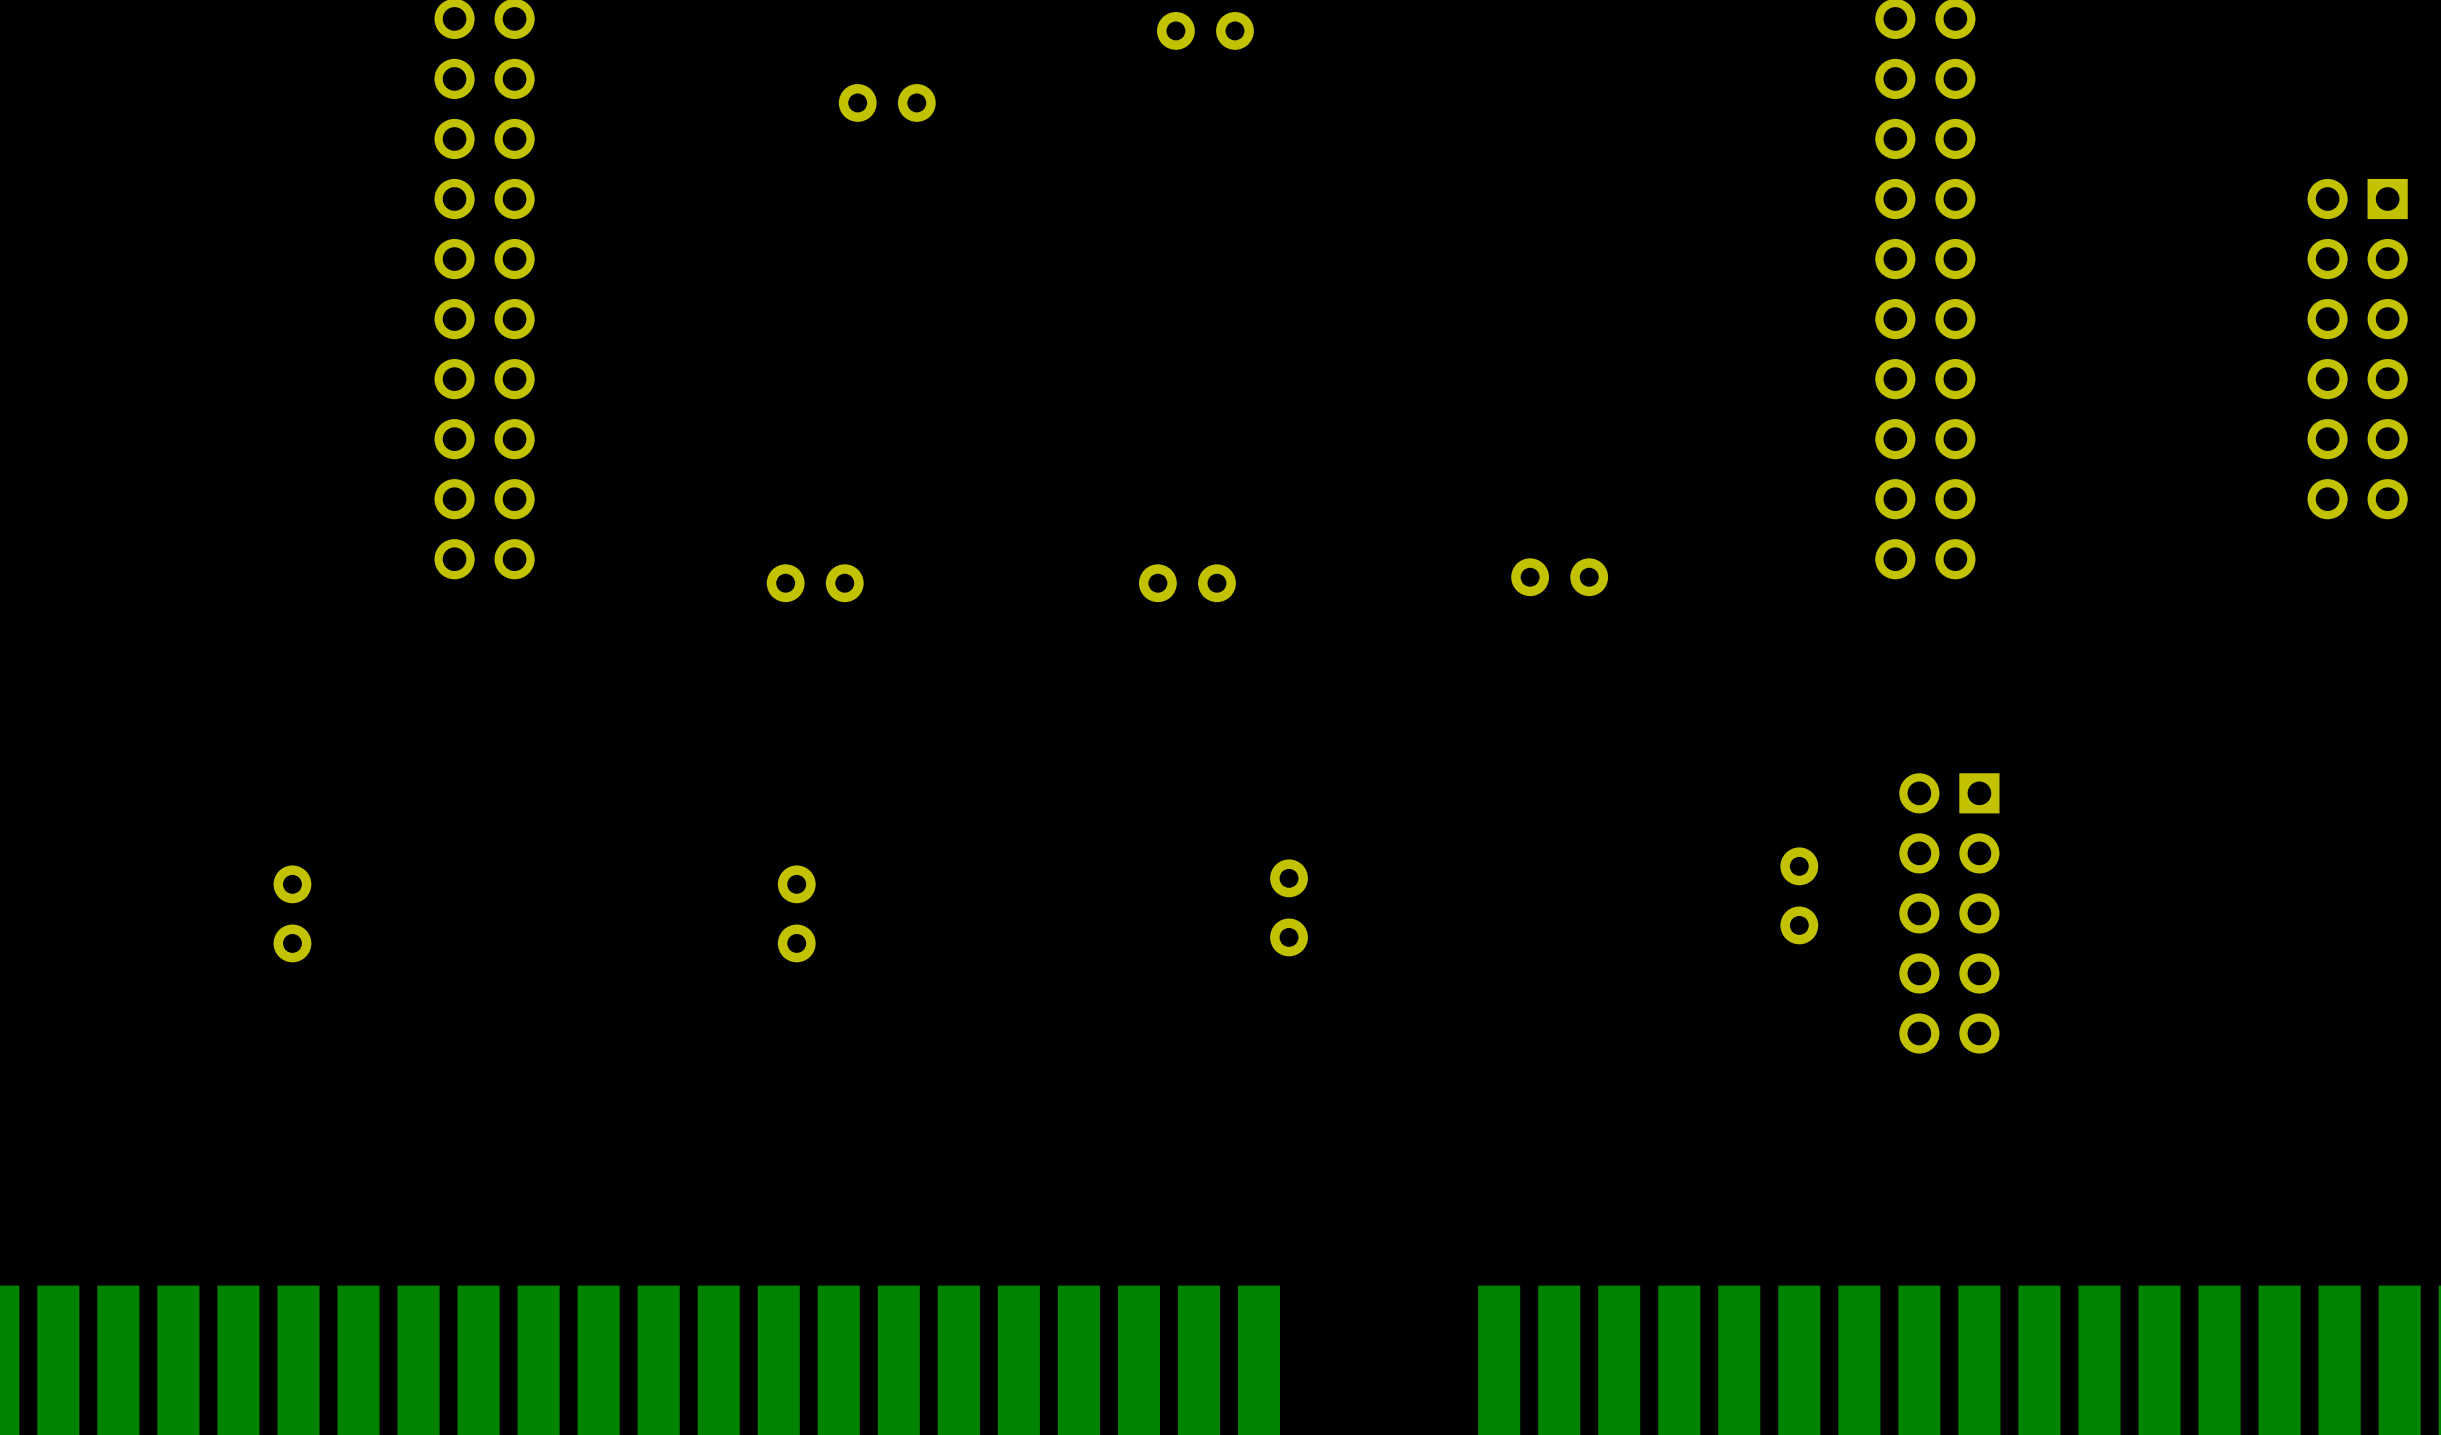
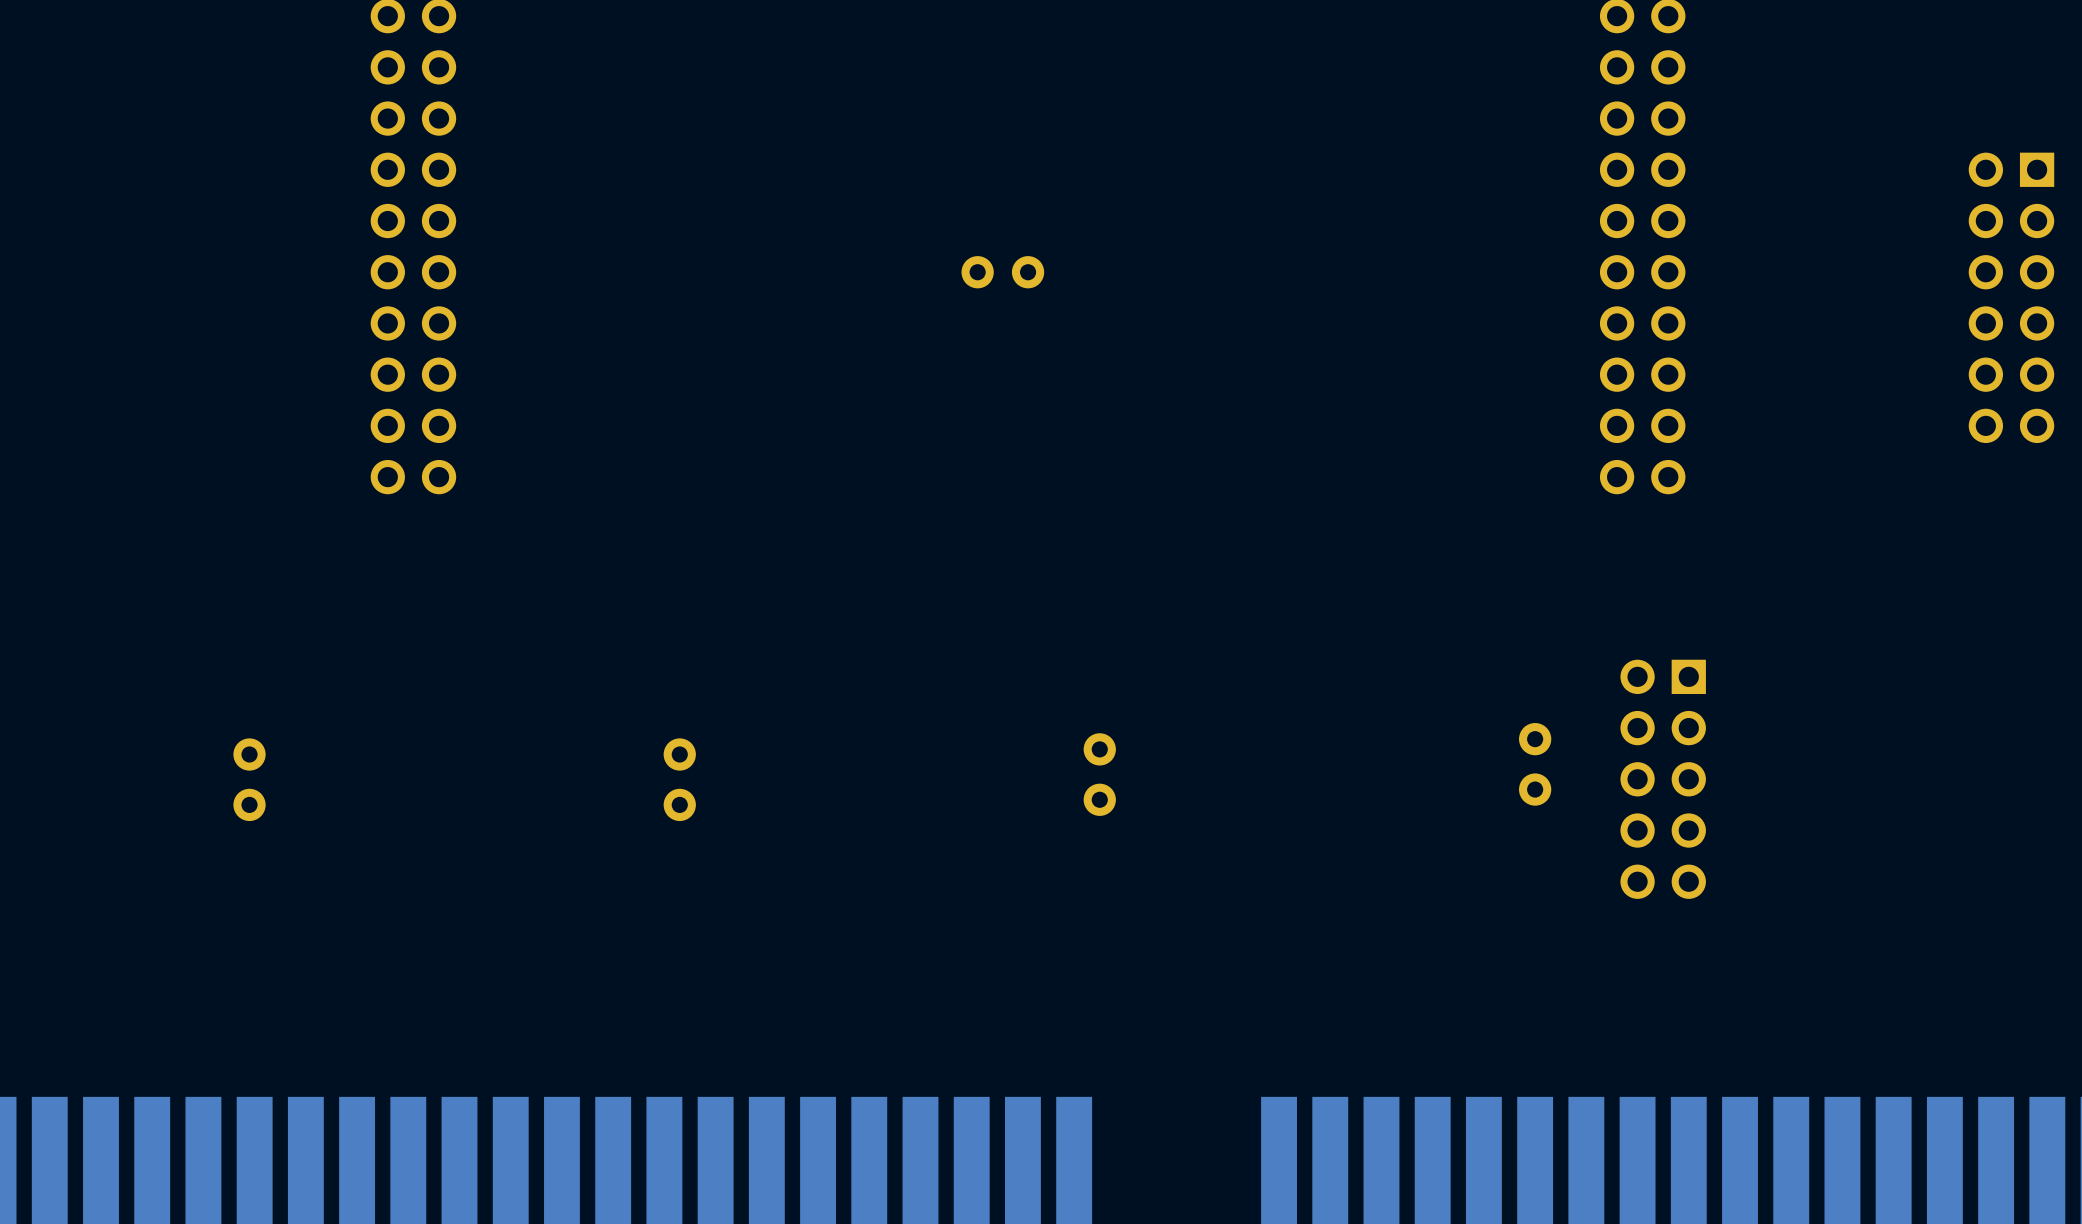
part: (1205, 30) -> none
part: (887, 102) -> none
part: none -> (1002, 272)
part: (1559, 577) -> none
part: (815, 583) -> none
part: (1187, 583) -> none

